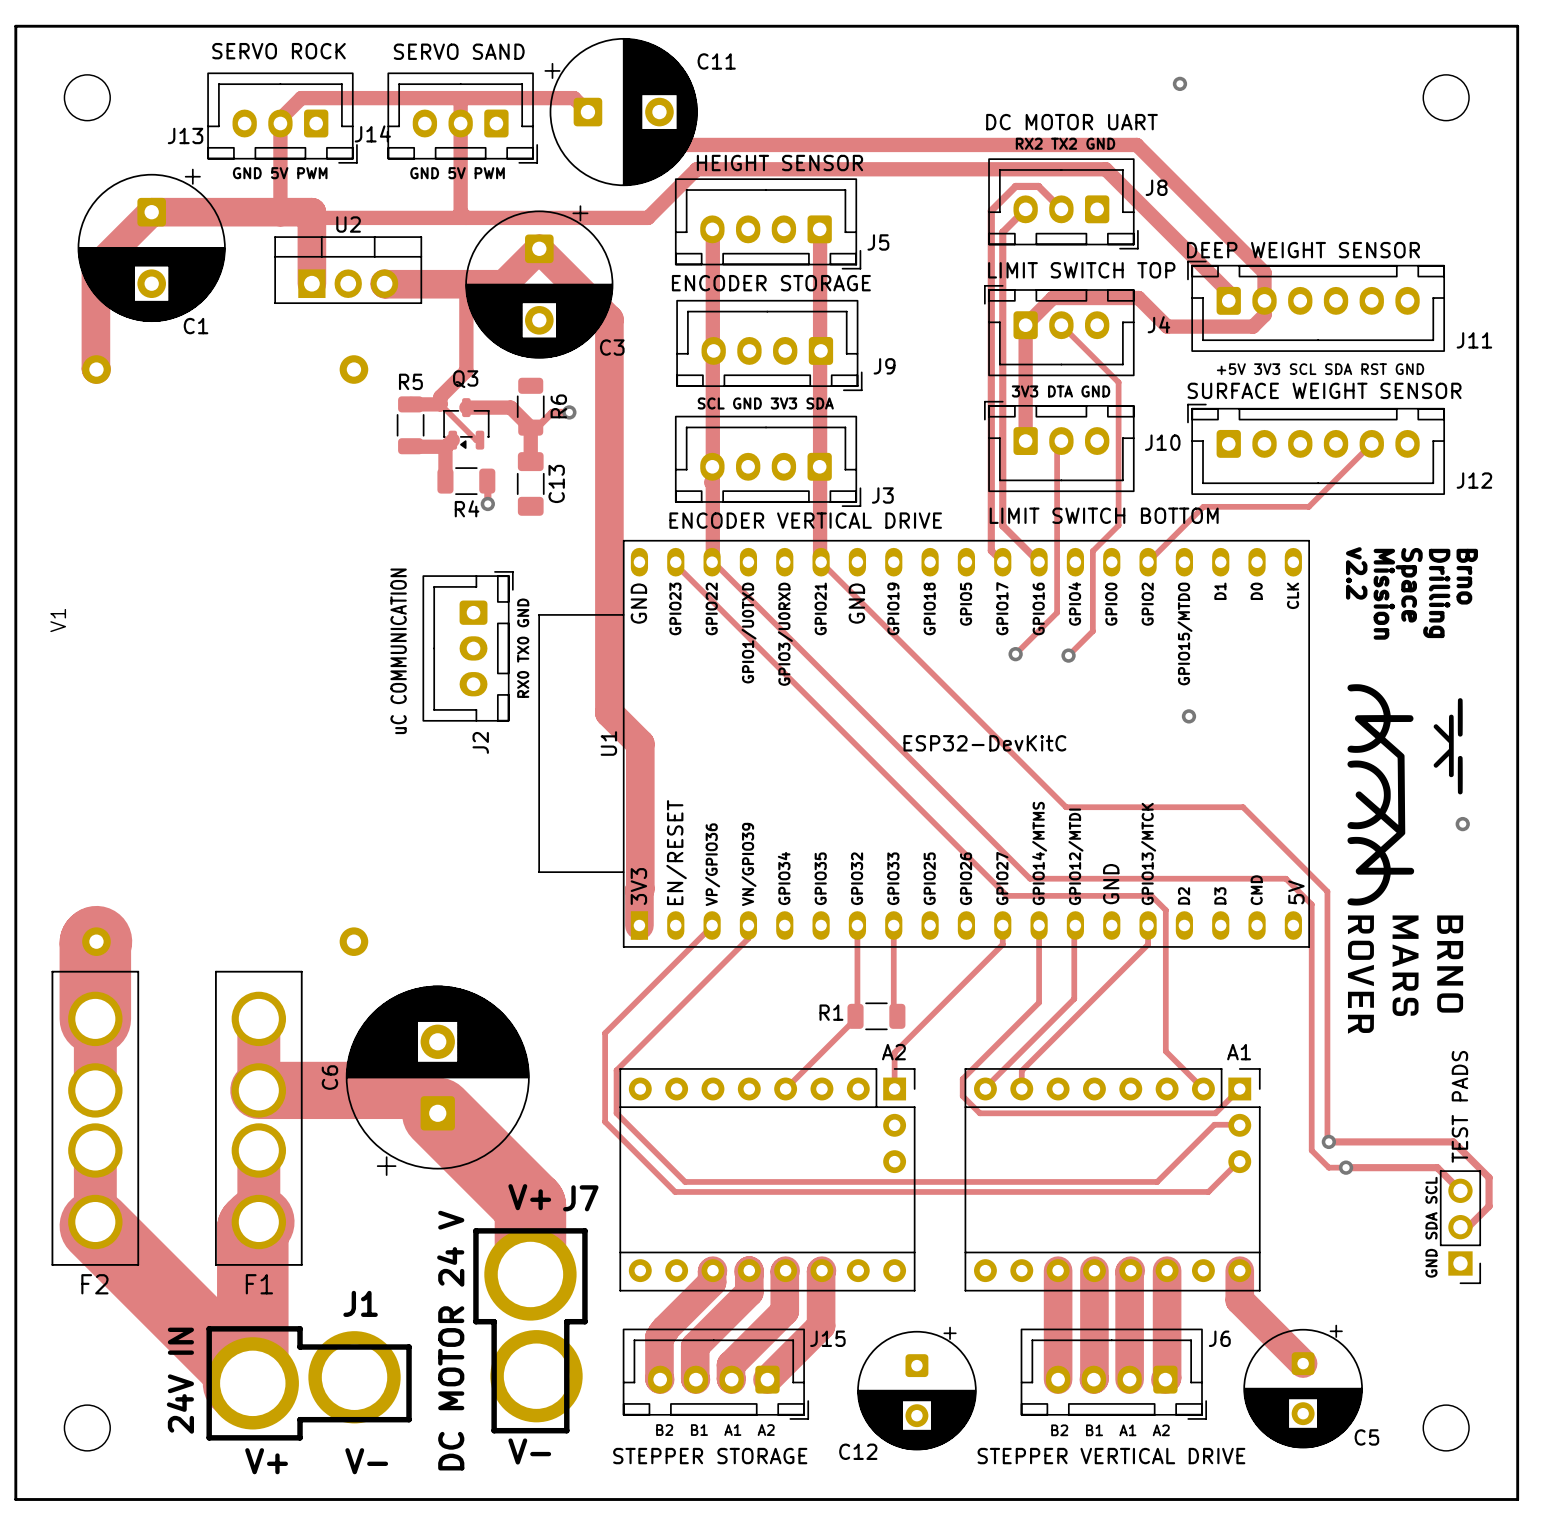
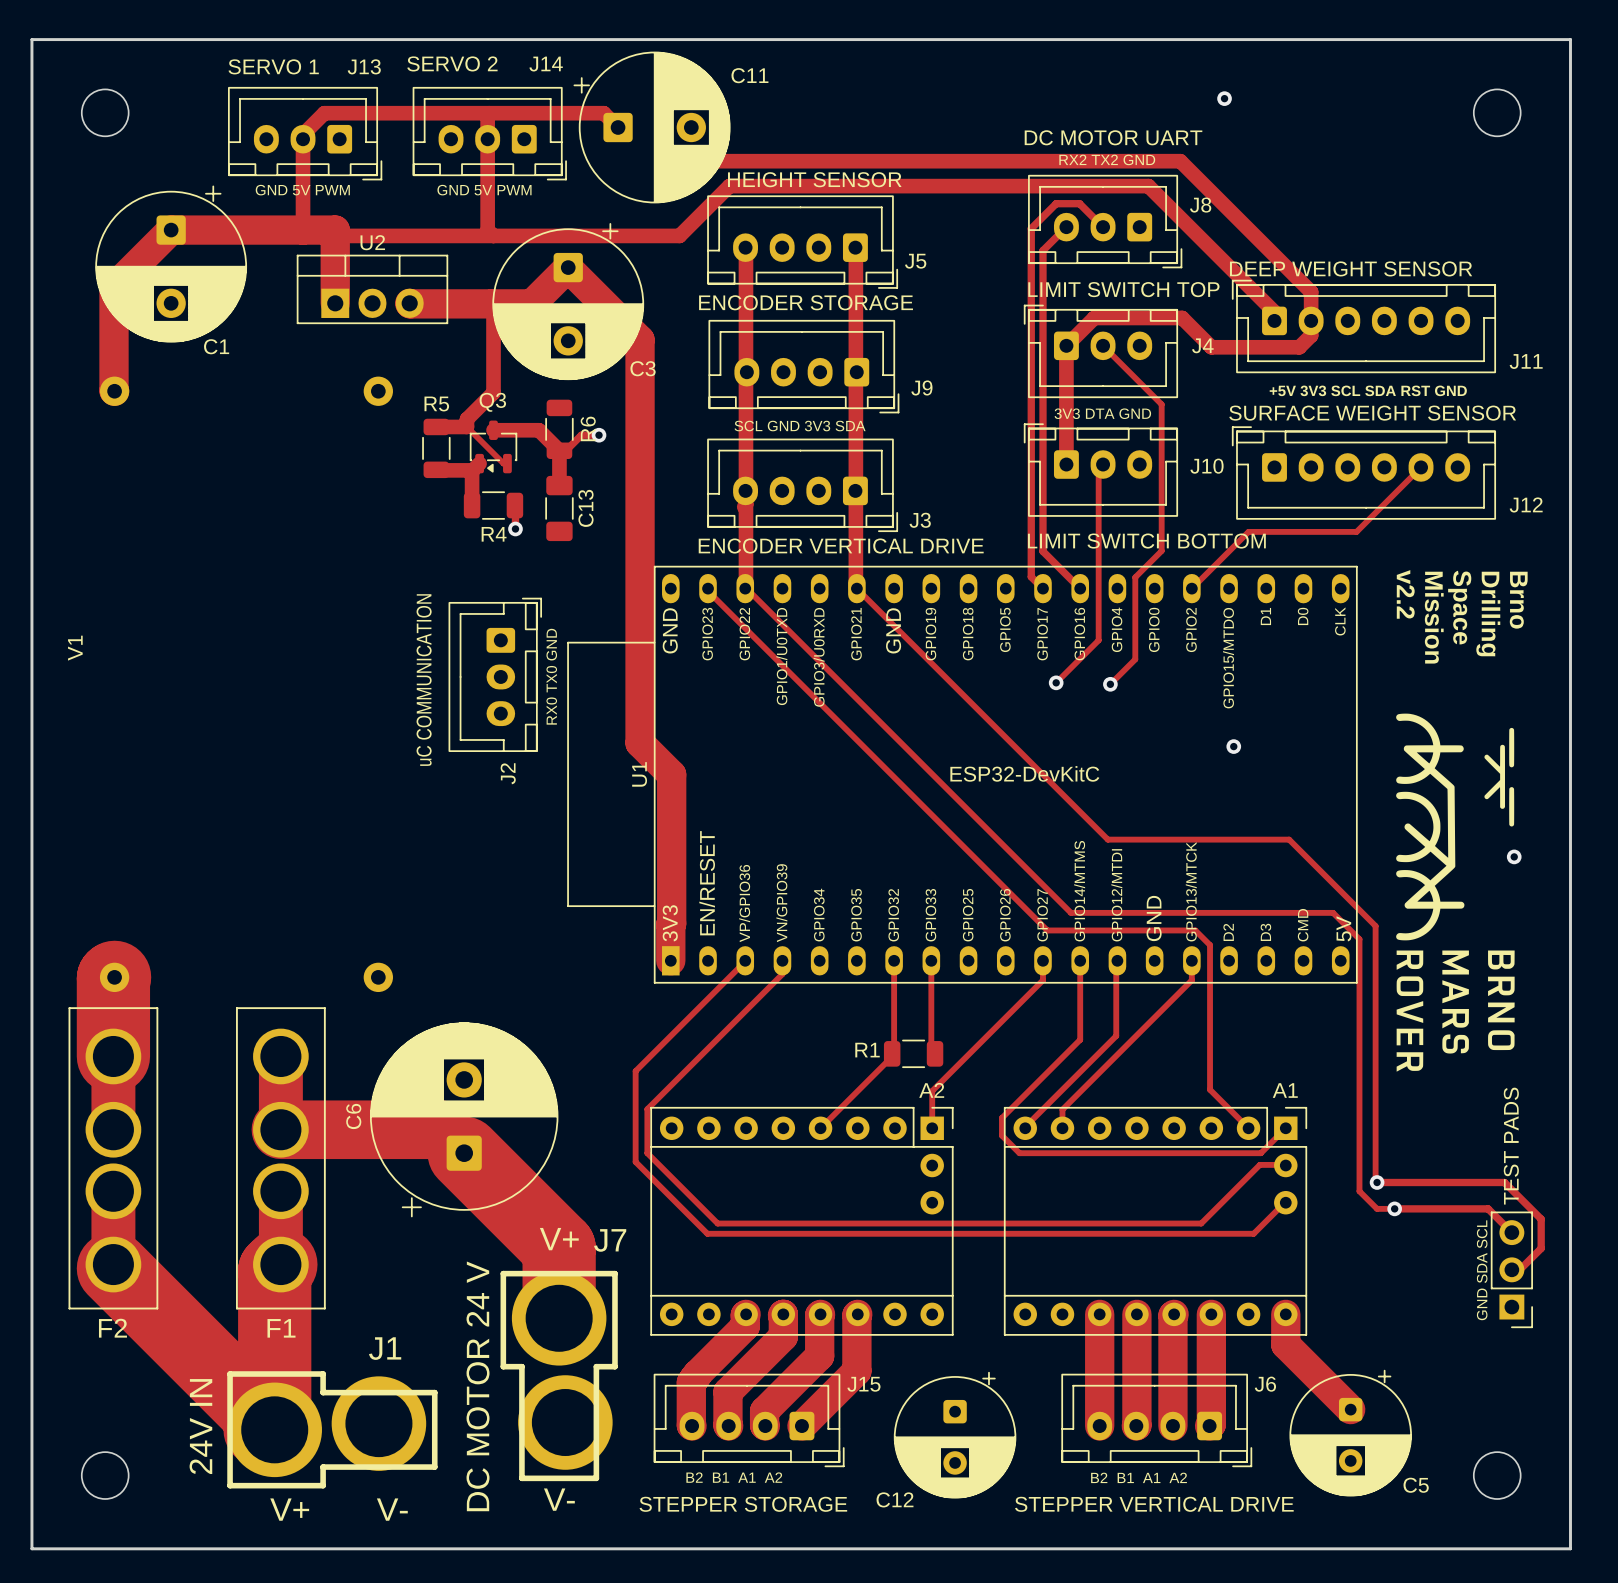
J13 value: SERVO ROCK (278, 51) -> SERVO 1 (273, 66)
J14 value: SERVO SAND (459, 51) -> SERVO 2 (452, 63)
J14 name position: J14 (372, 133) -> J14 (546, 64)
J13 name position: J13 (185, 135) -> J13 (364, 66)

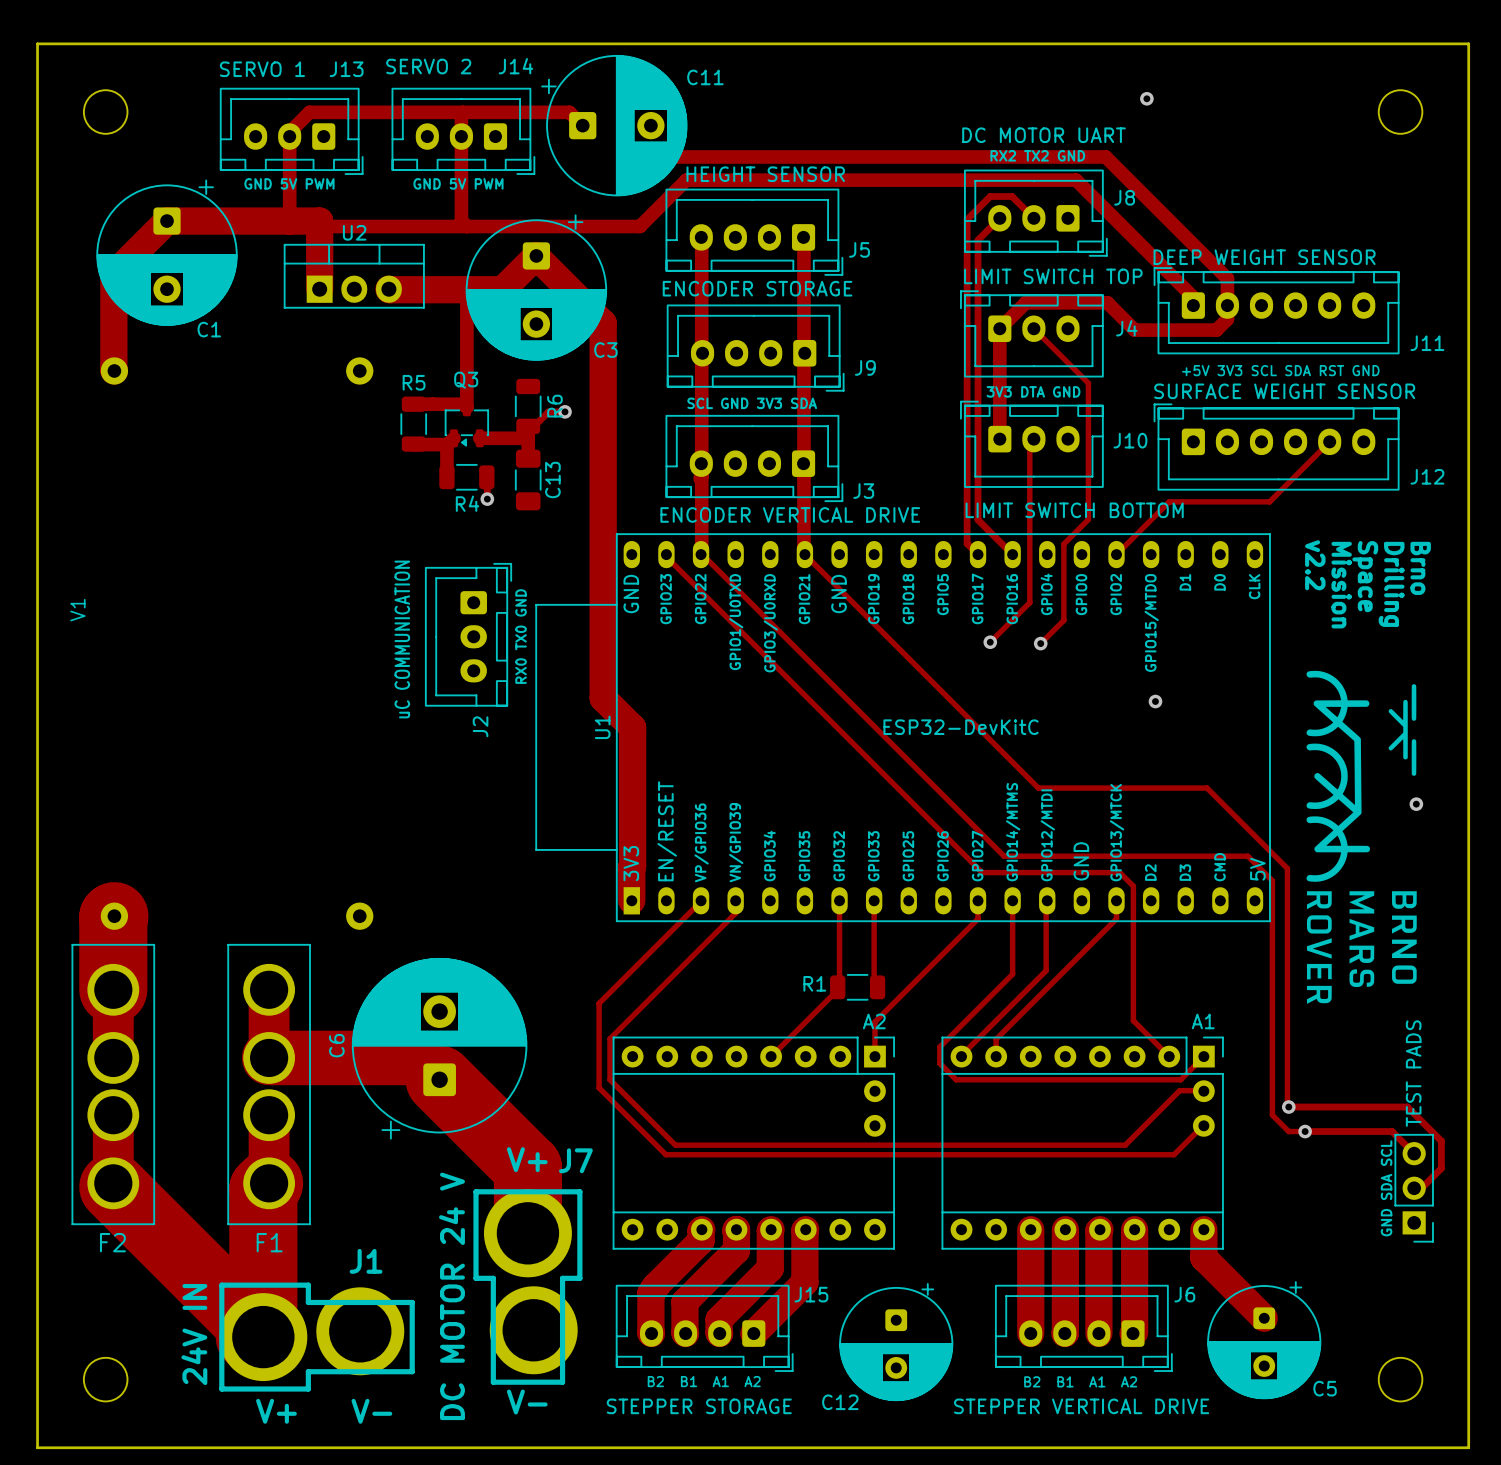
track: (493, 392) (466, 419) (466, 426) (503, 463) (507, 463) -> (466, 372) (466, 407) (463, 404) (442, 404)
track: (493, 430) (538, 430) (559, 450) -> none
track: none -> (479, 438) (528, 439)

